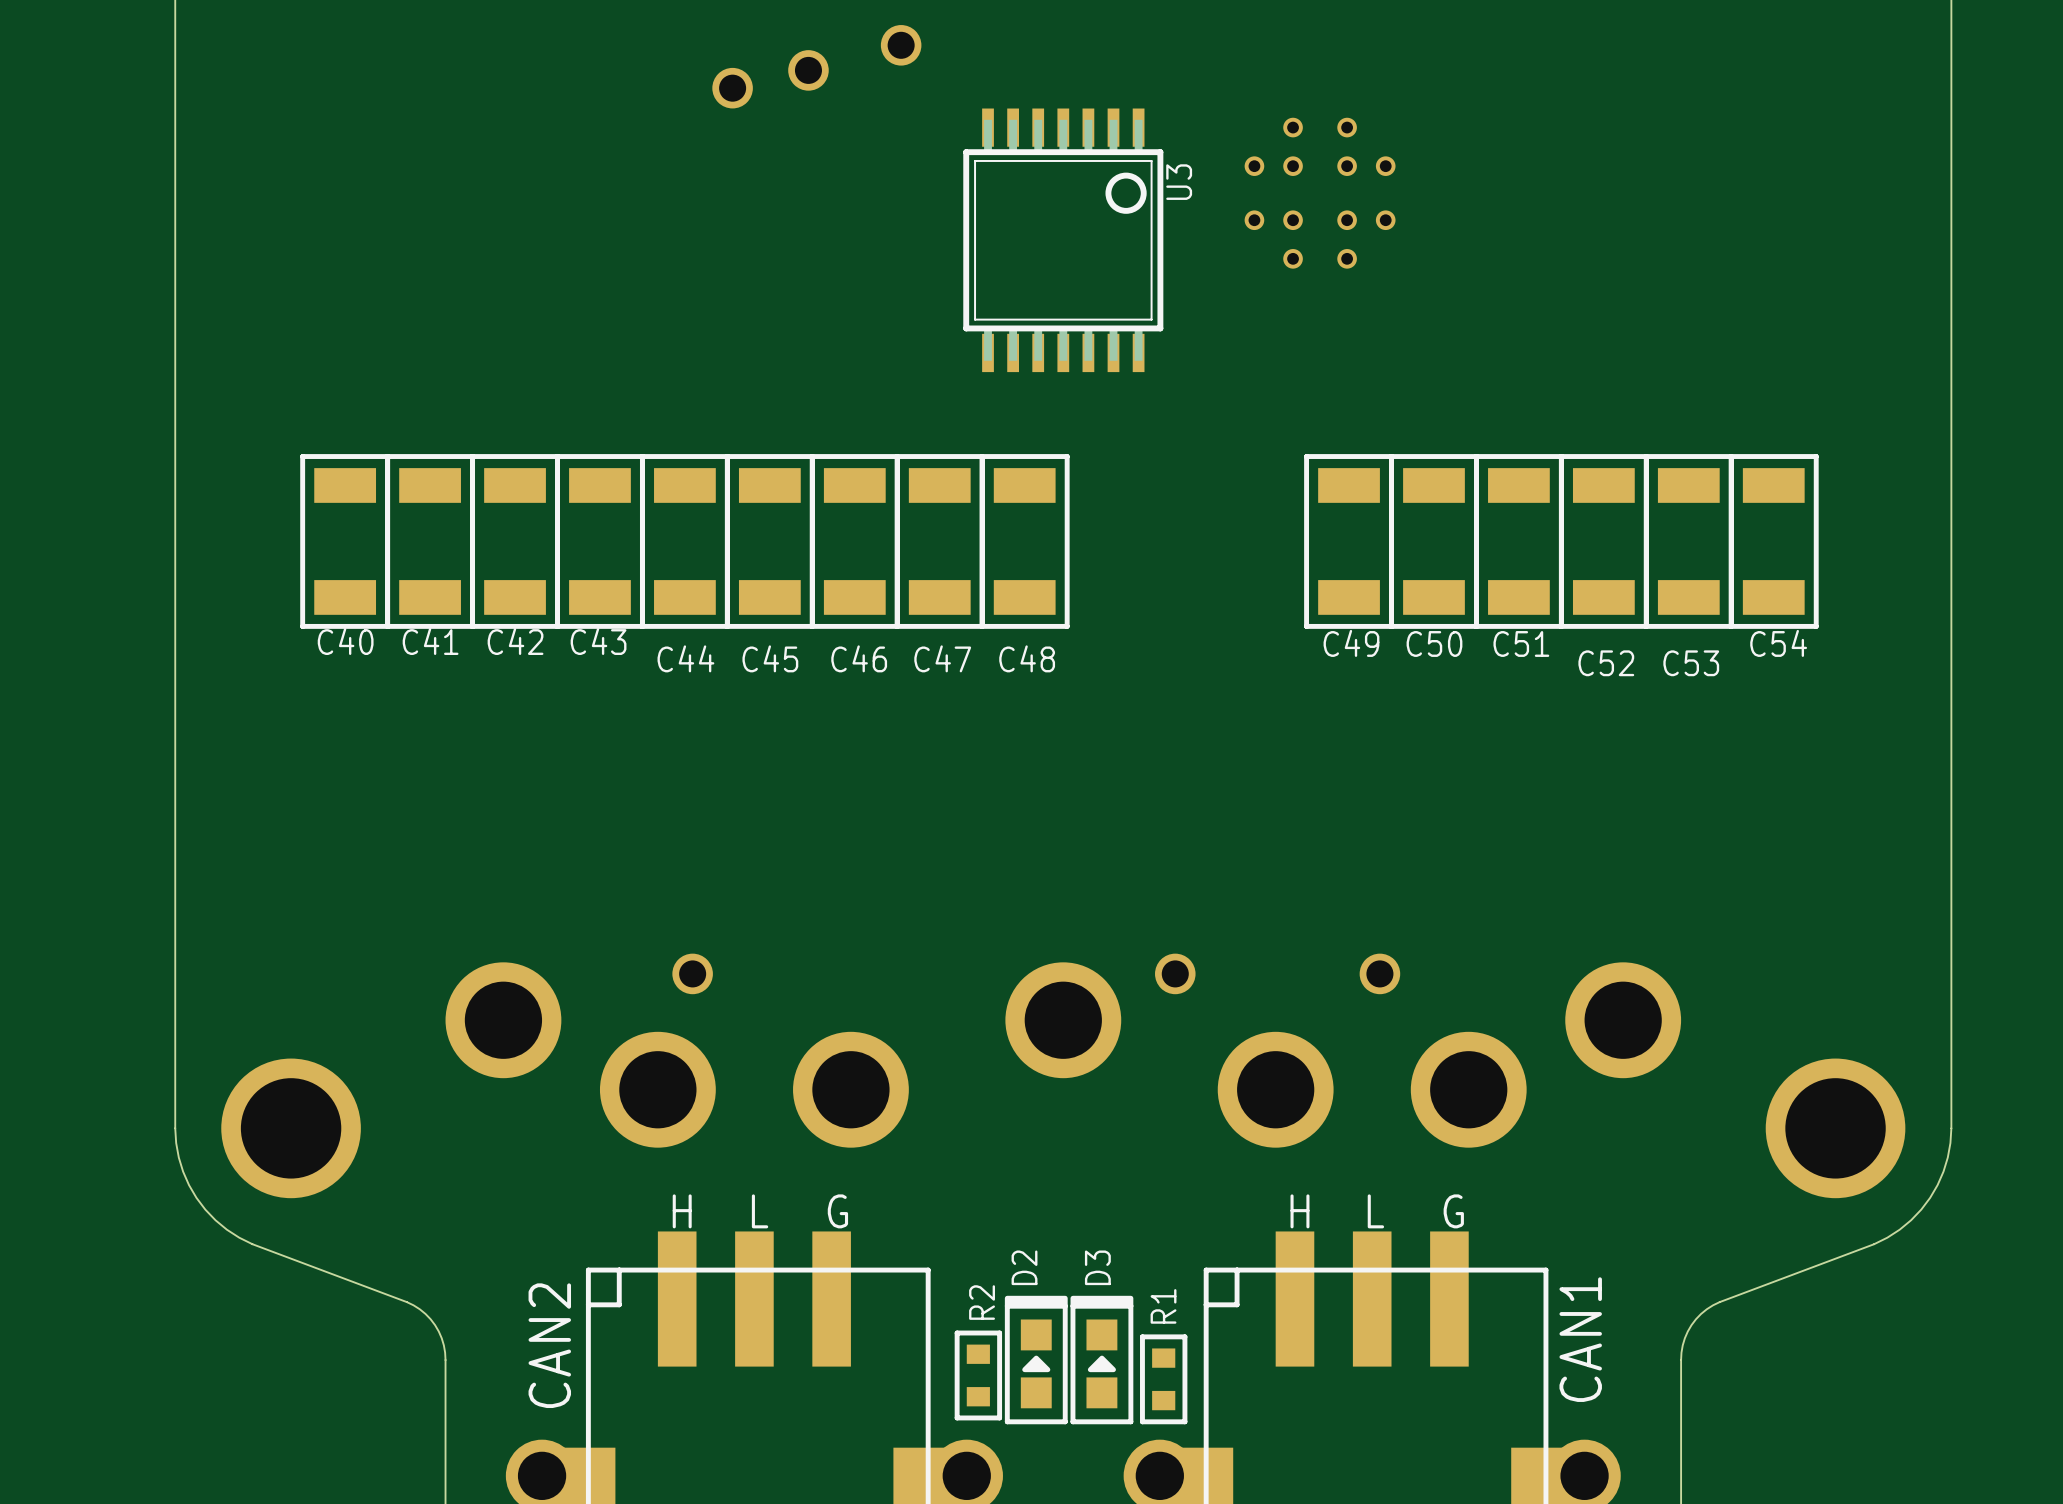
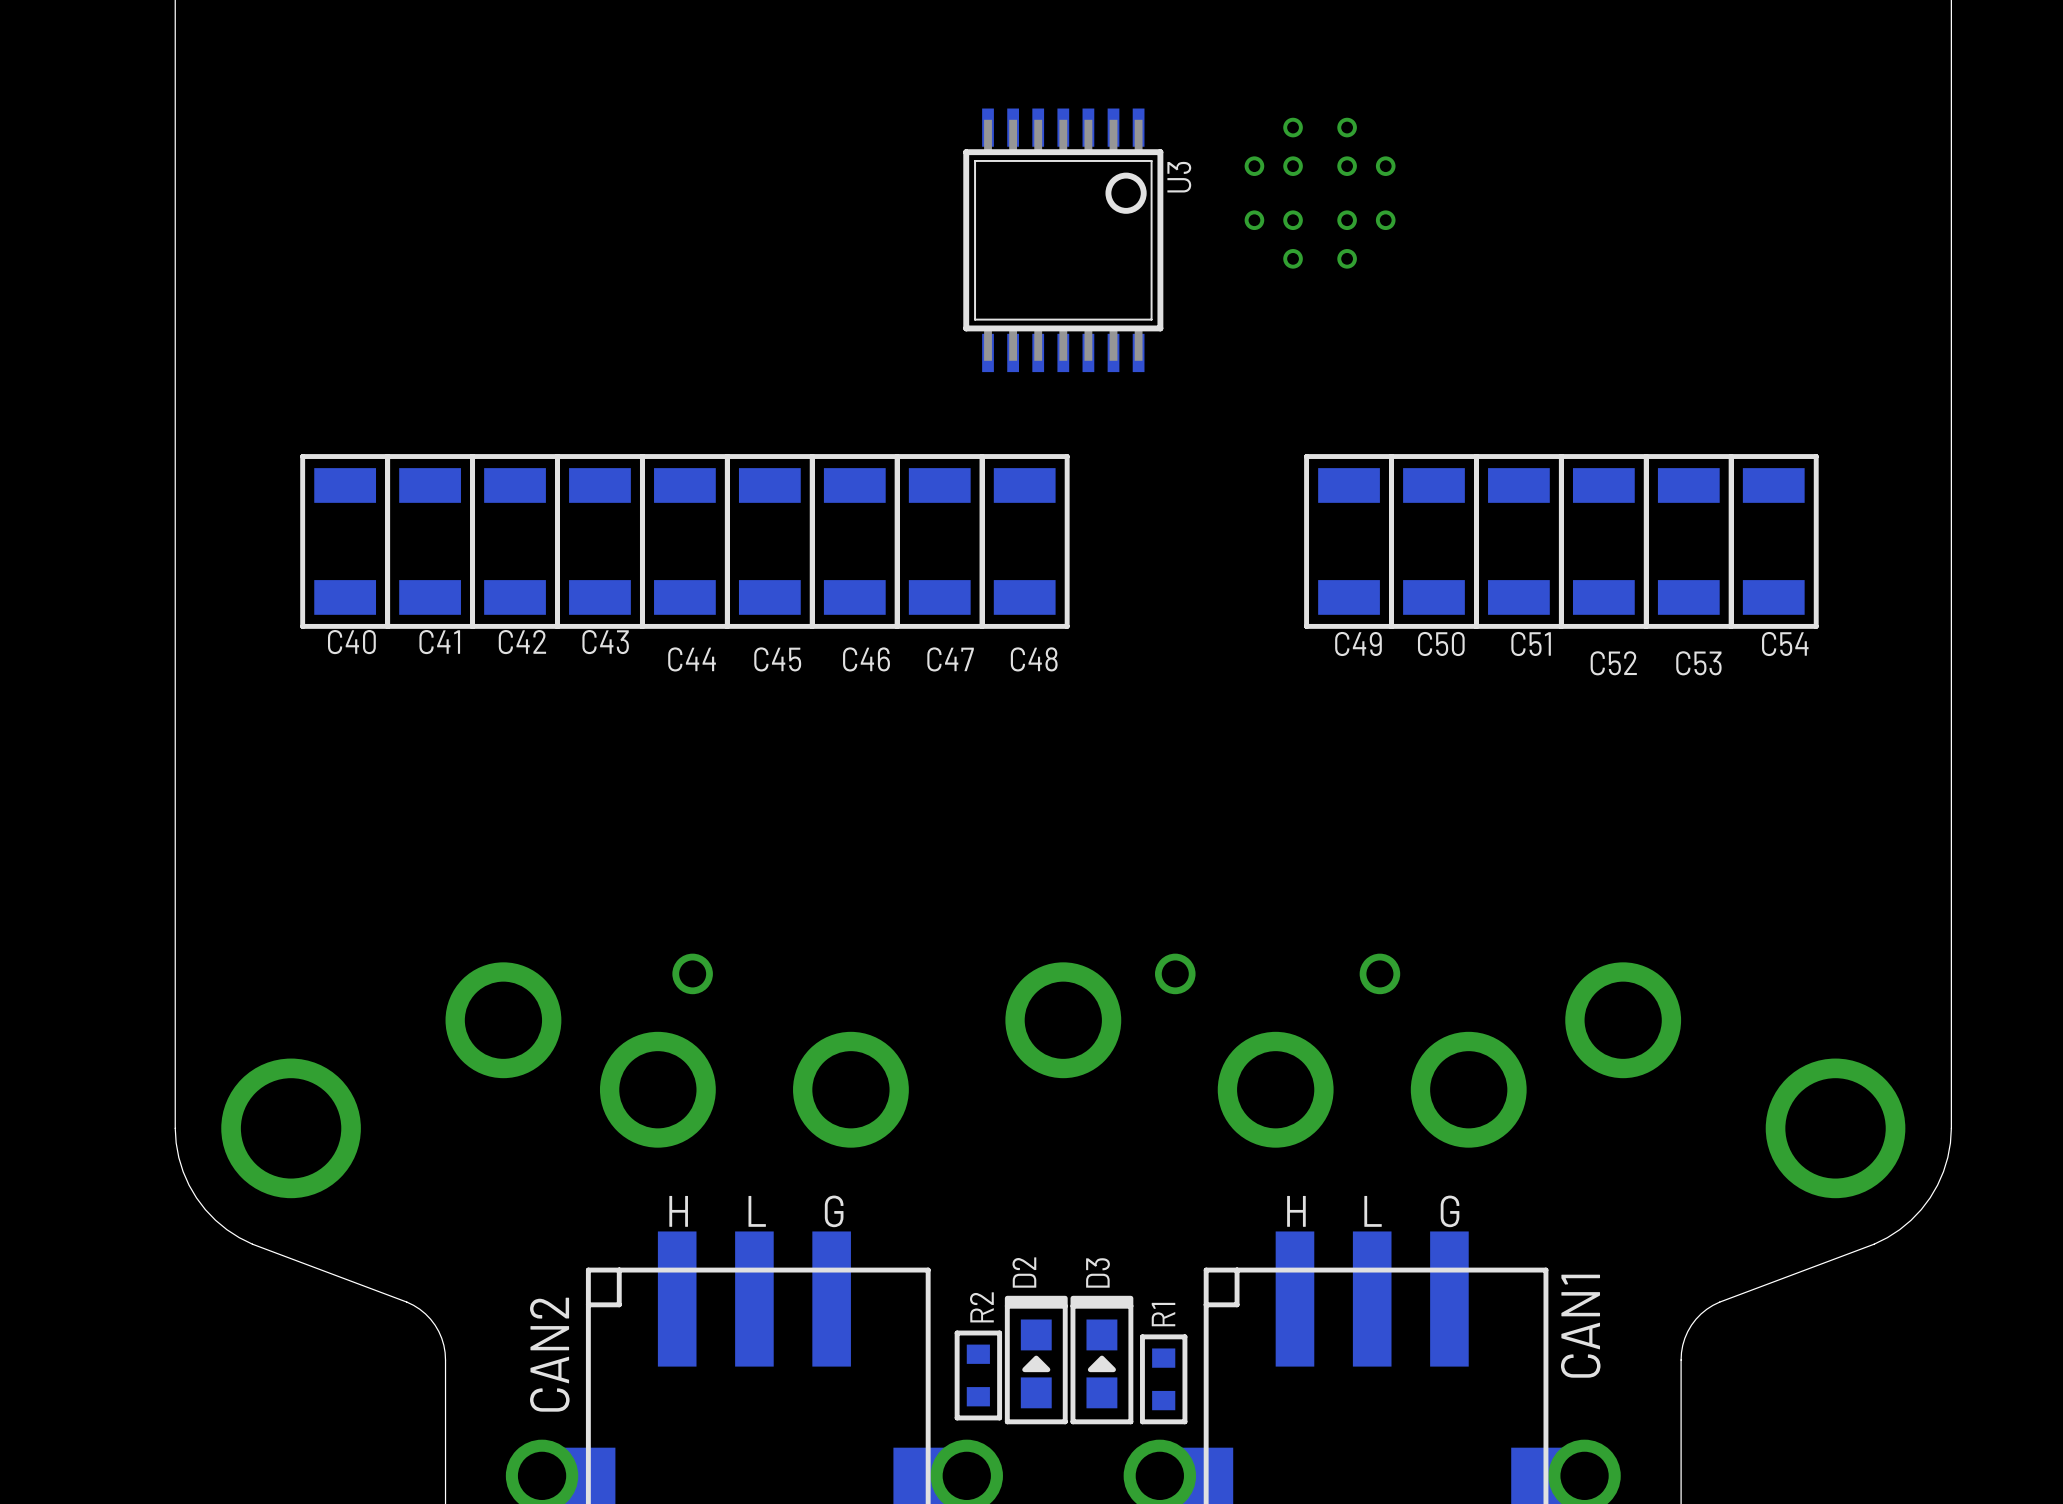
part: (901, 45) -> none
part: (808, 70) -> none
part: (732, 88) -> none

